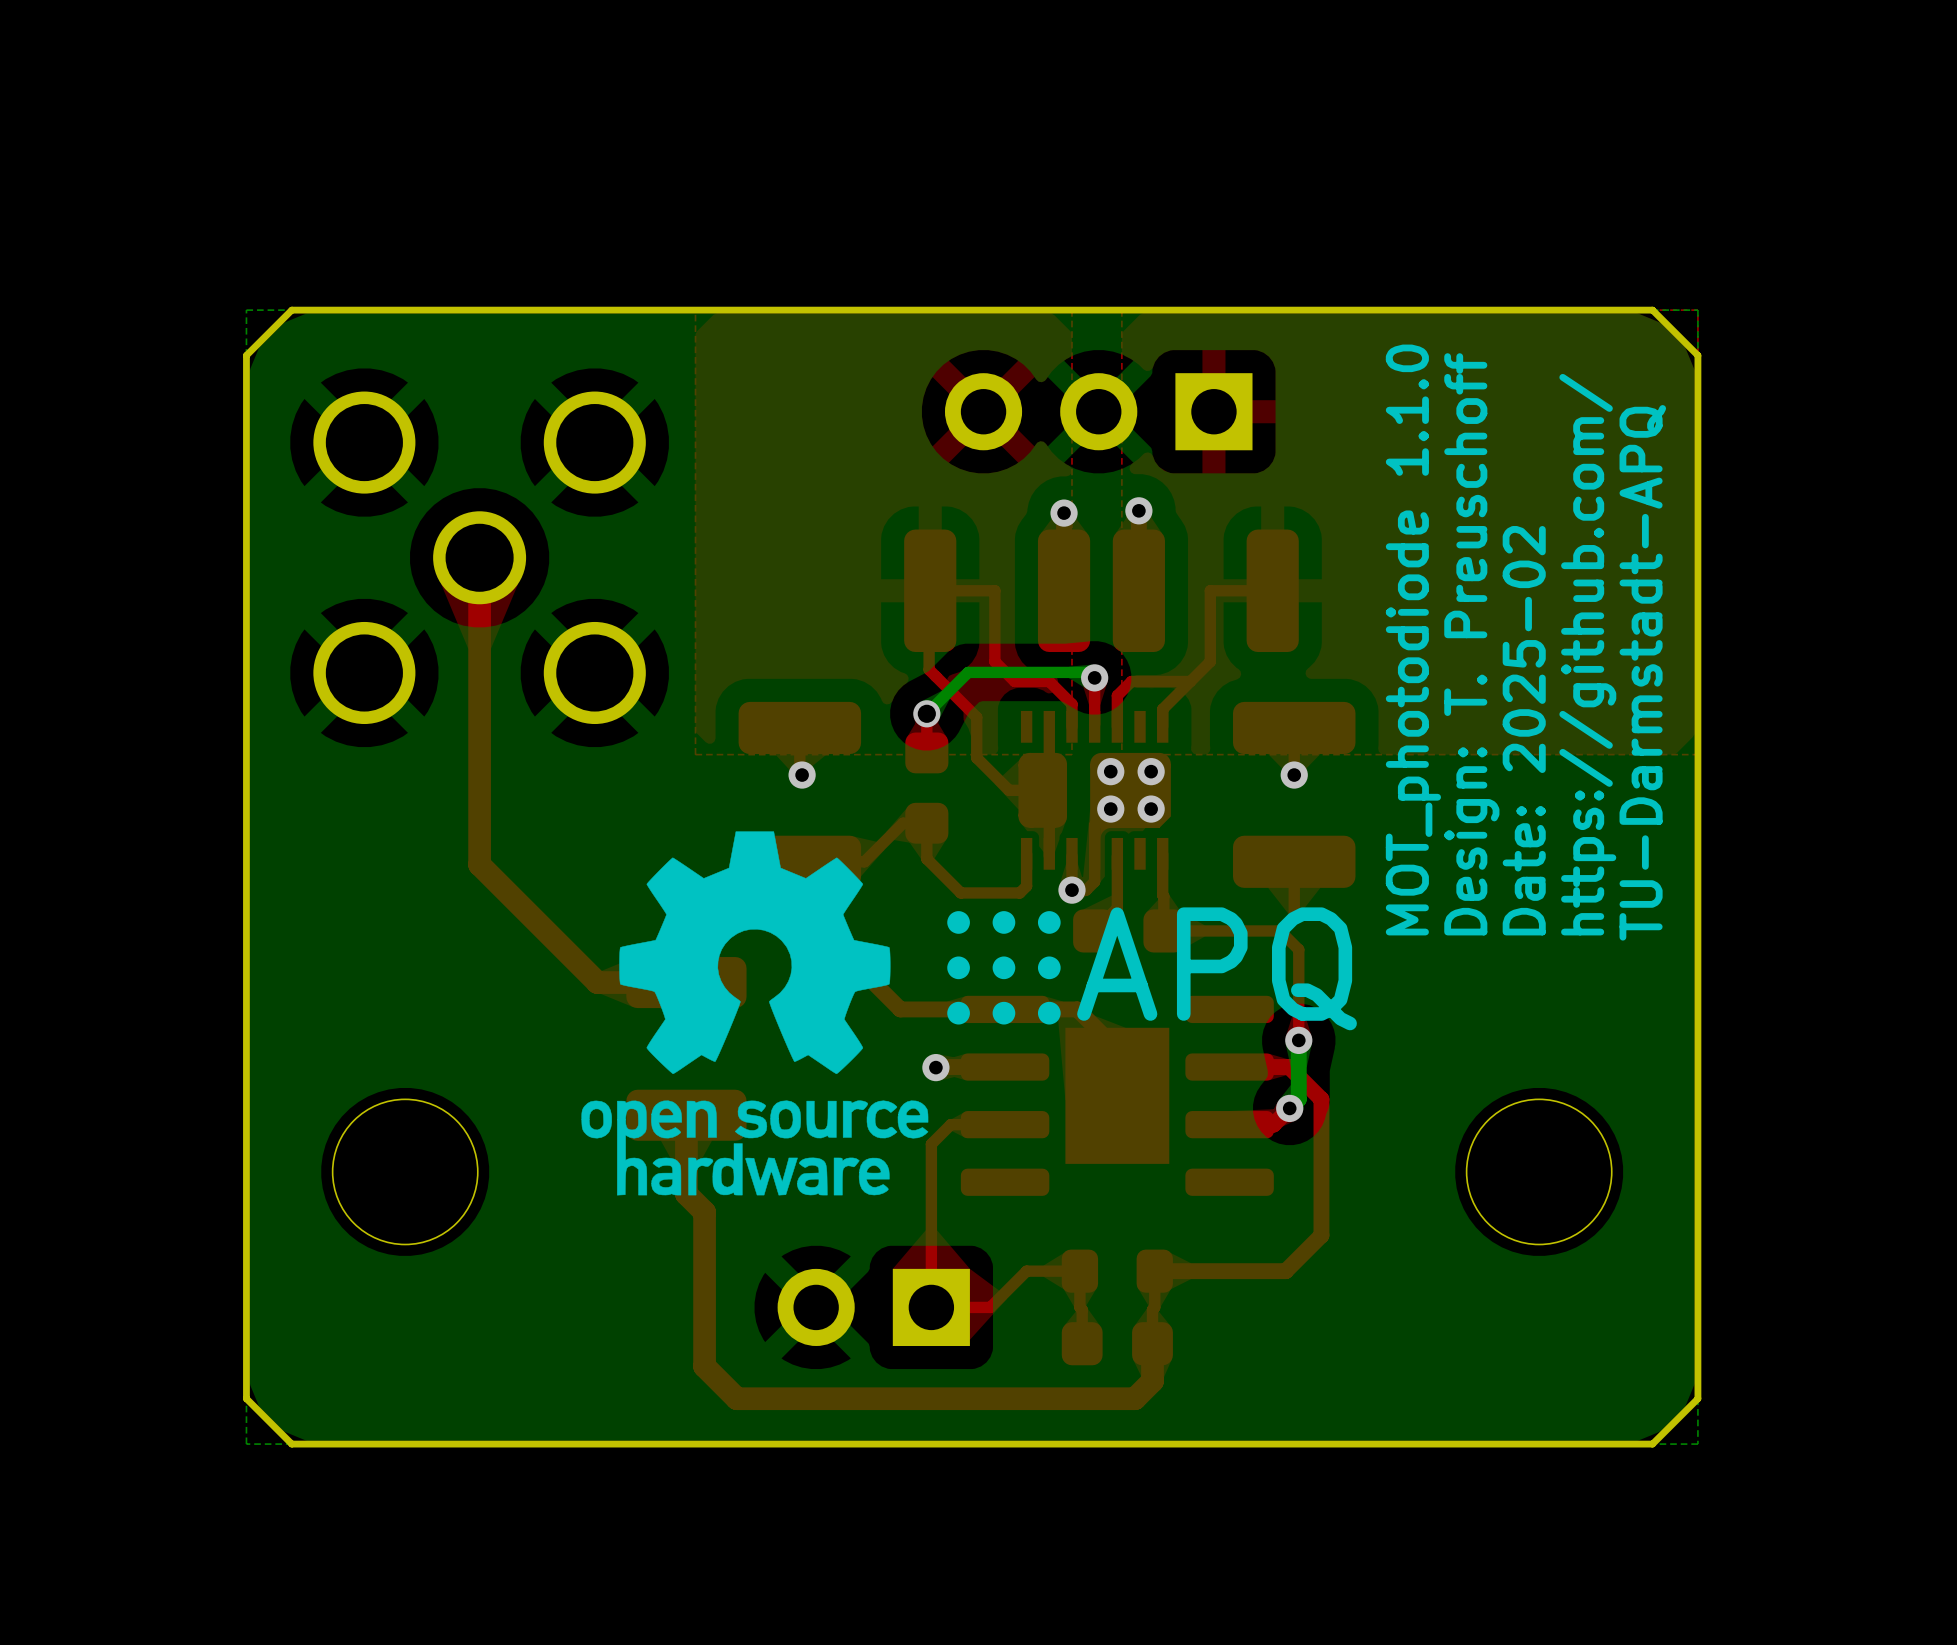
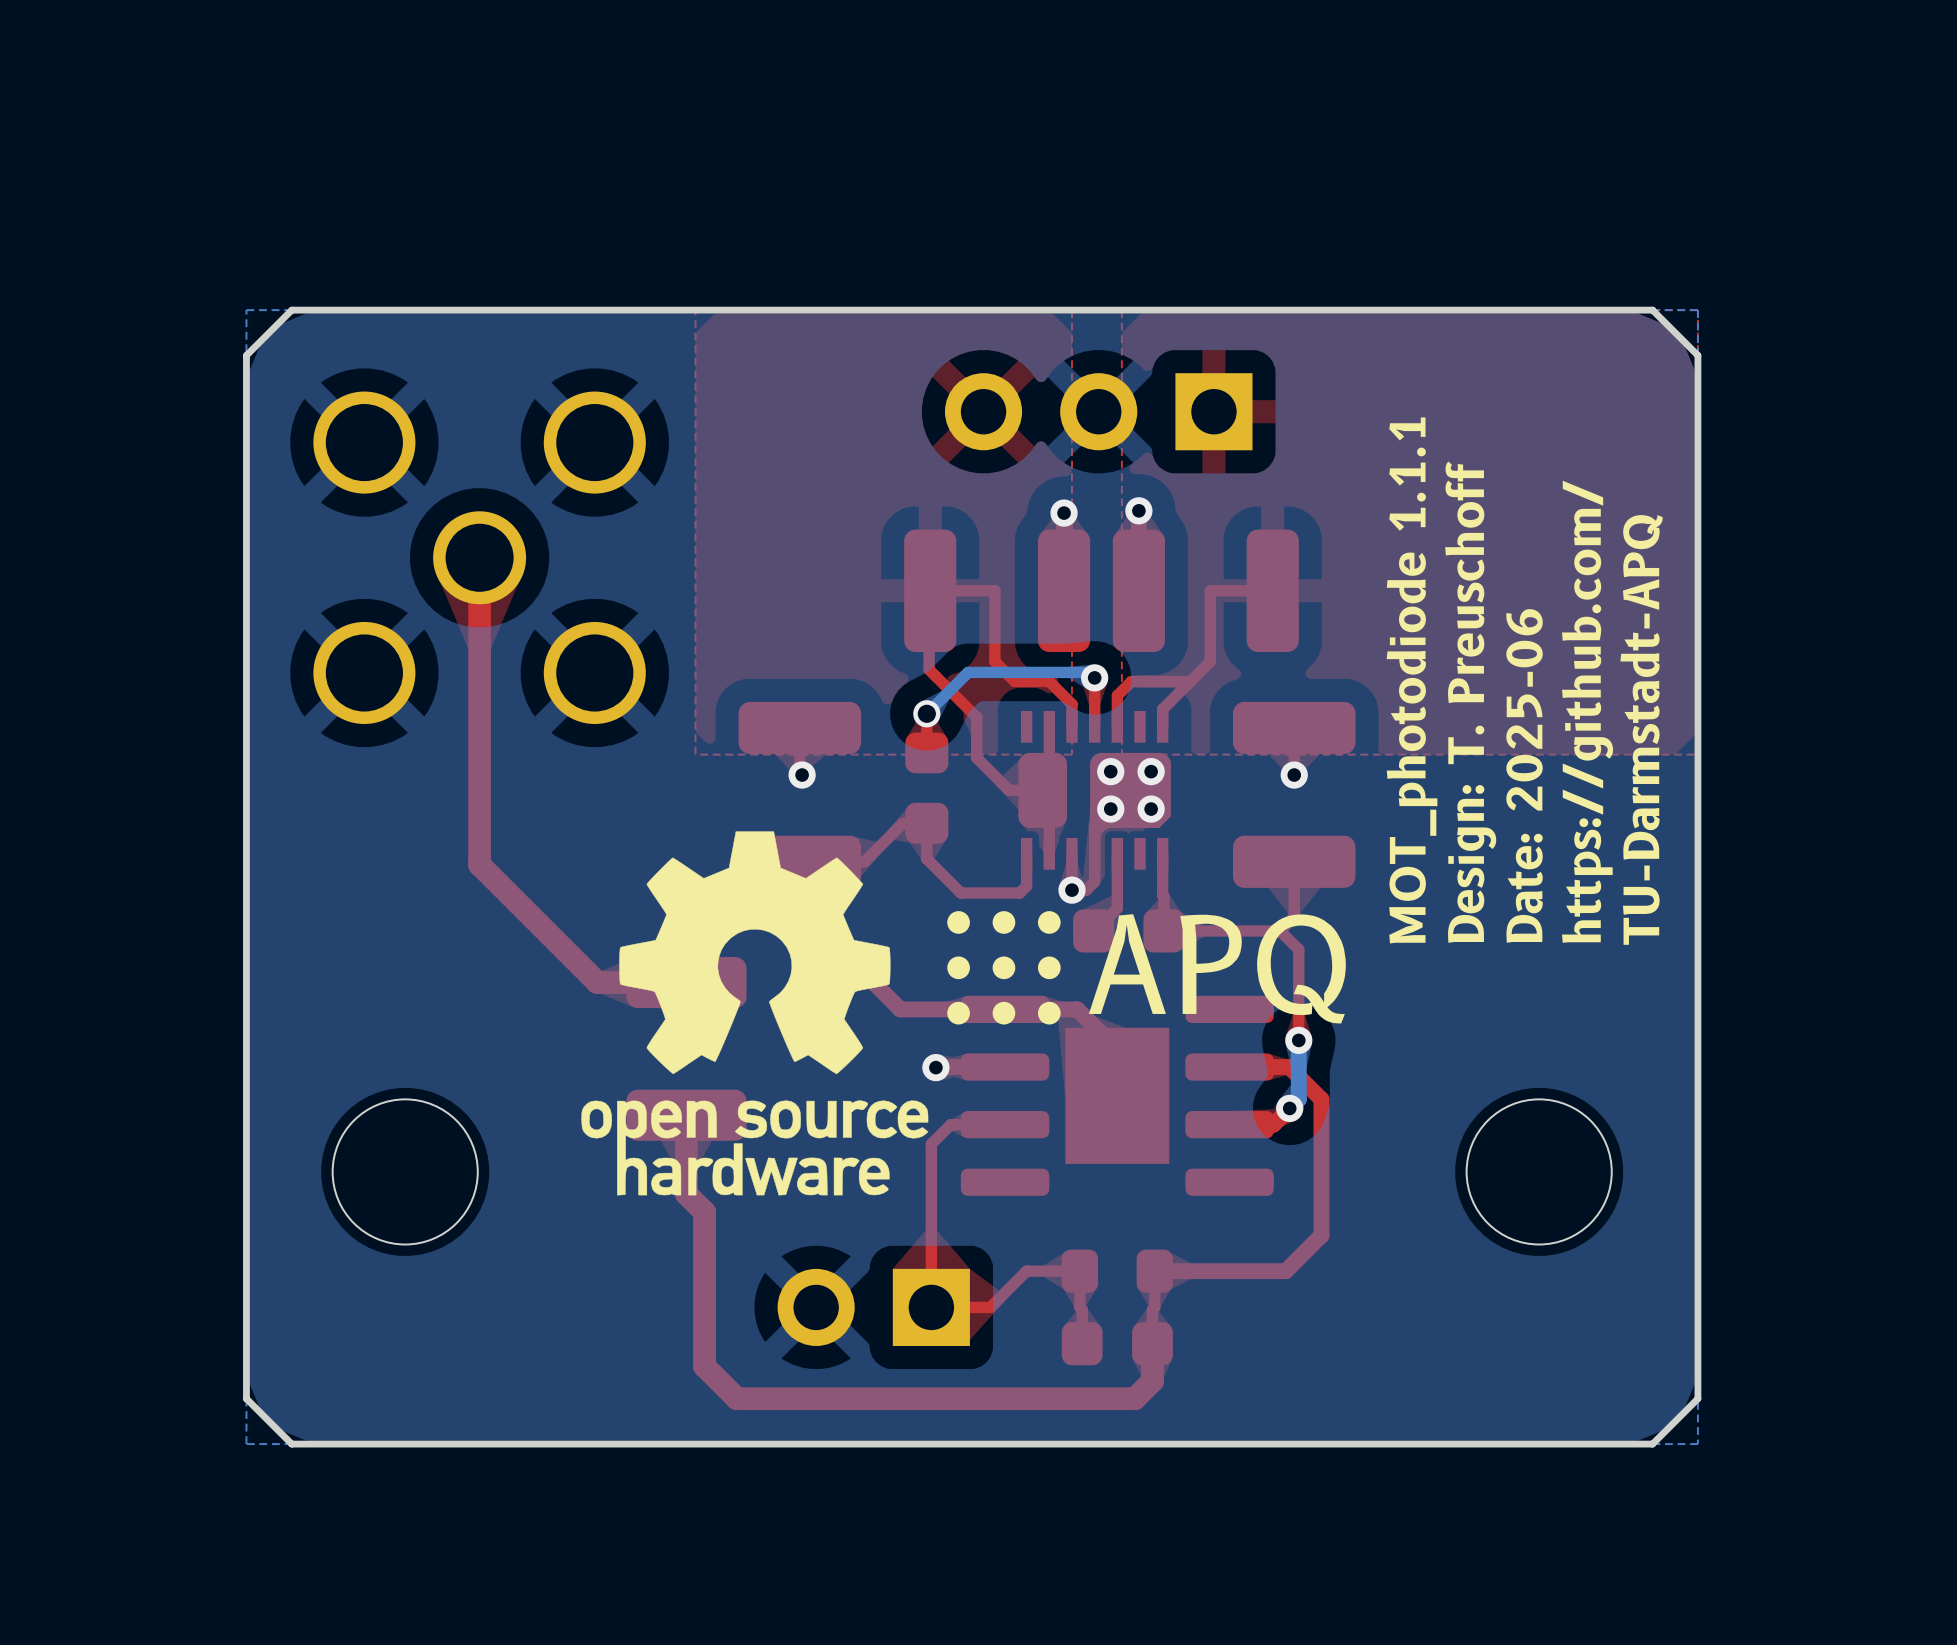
text: MOT_photodiode 1.1.0 (1413, 640) -> MOT_photodiode 1.1.1 (1412, 680)
text: Date: 2025-02 (1524, 730) -> Date: 2025-06 (1524, 775)

